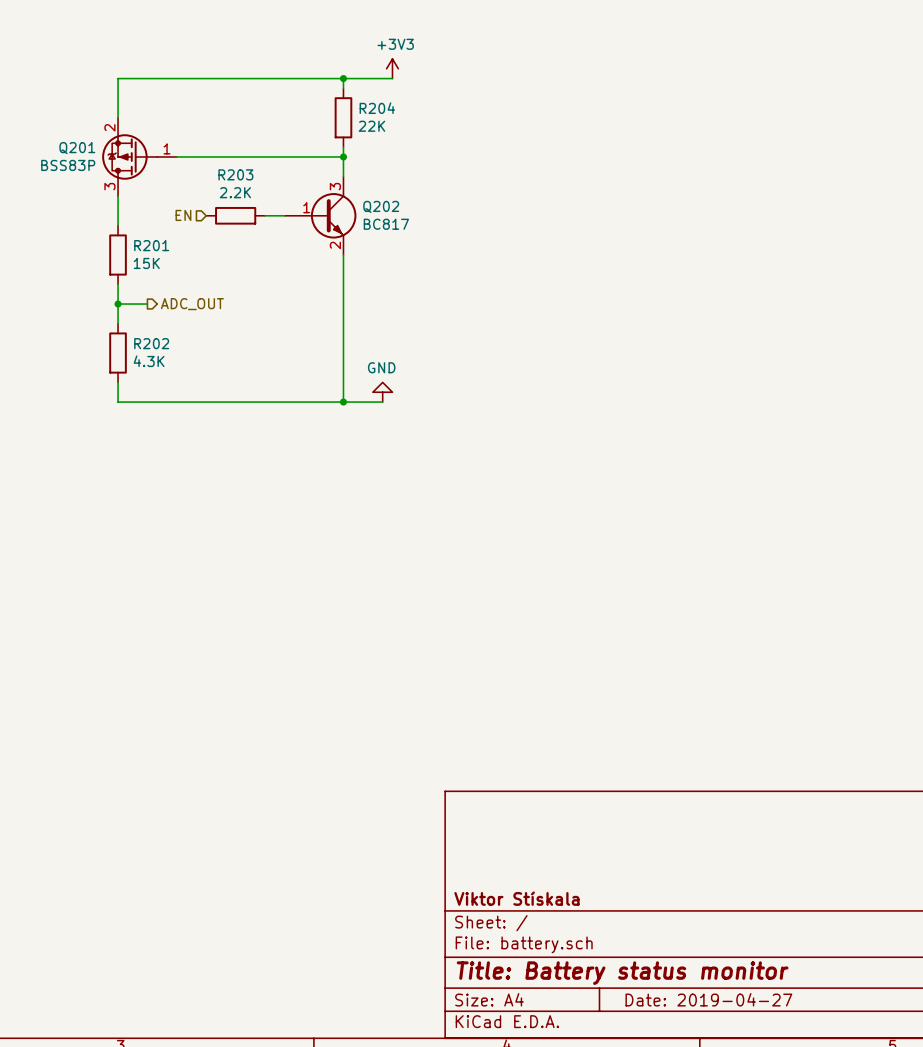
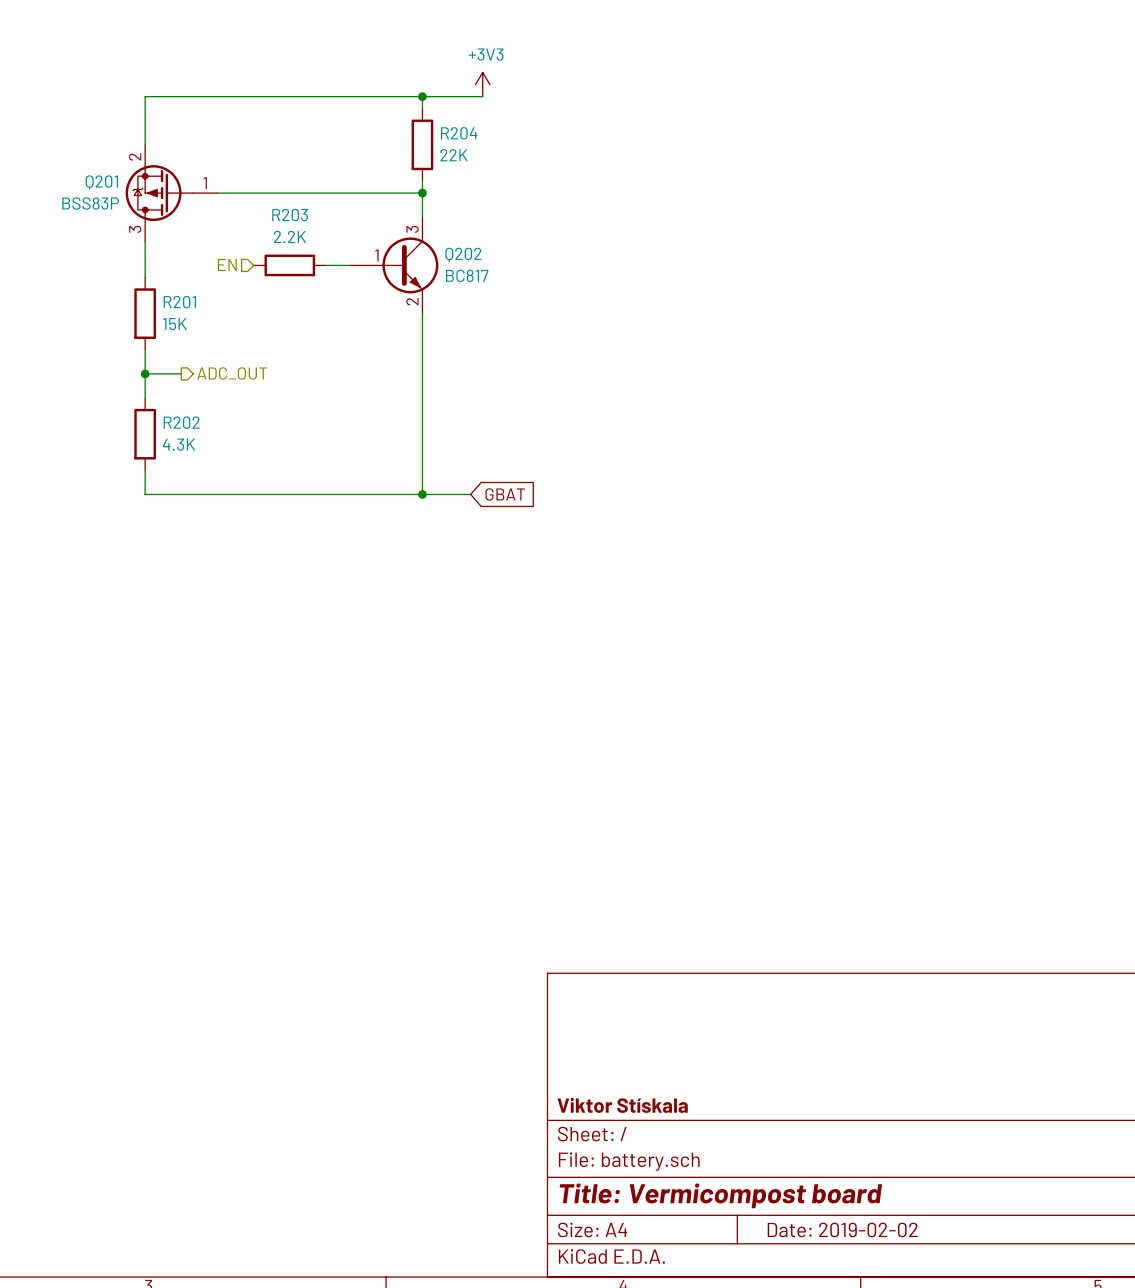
power symbol: GND (382, 392) -> none
global label: none -> GBAT (505, 494)
title block: Title: Battery status monitor (622, 973) -> Title: Vermicompost board (720, 1195)
title block: Date: 2019-04-27 (708, 999) -> Date: 2019-02-02 (842, 1229)

